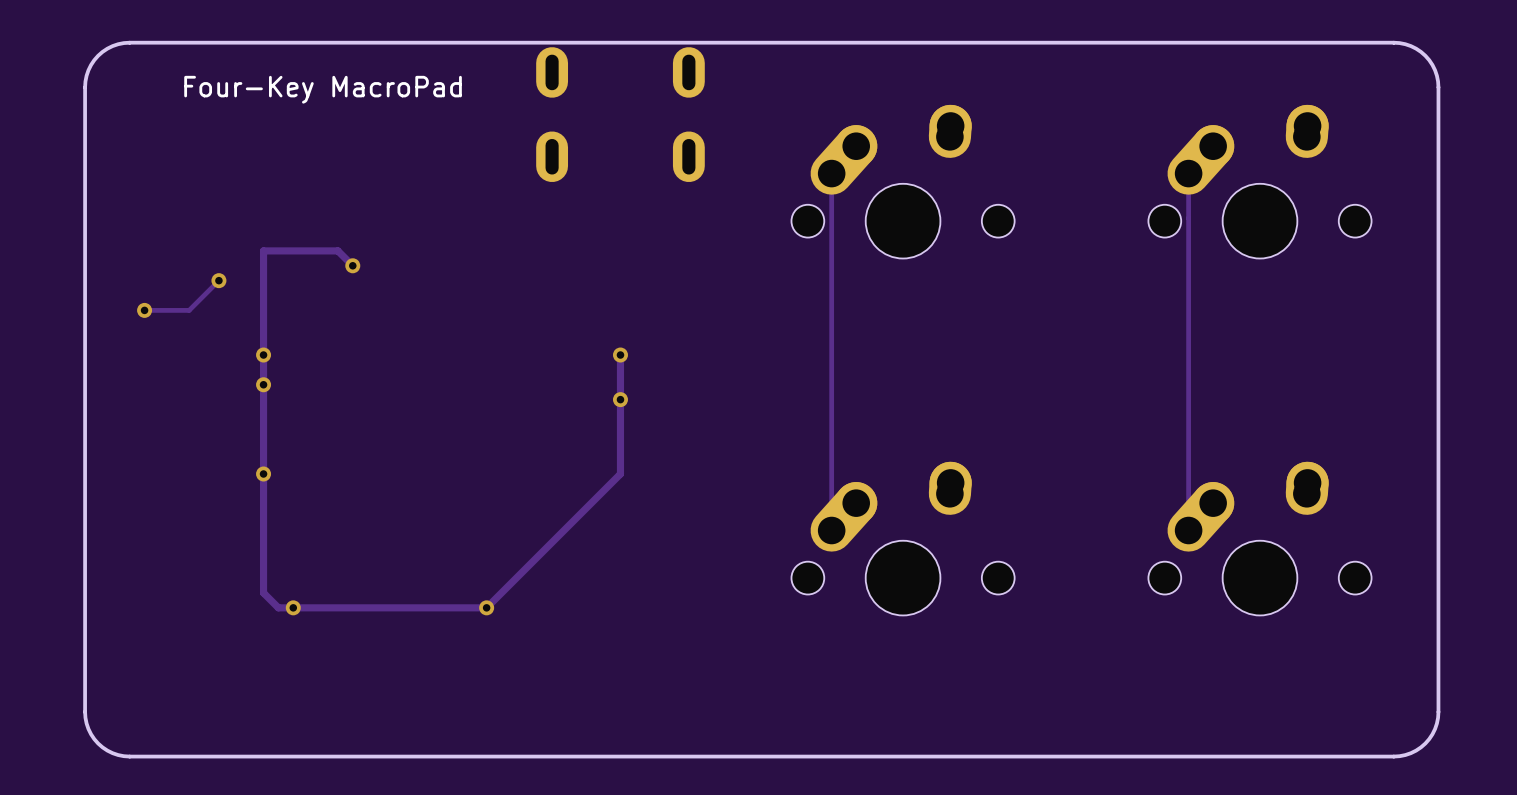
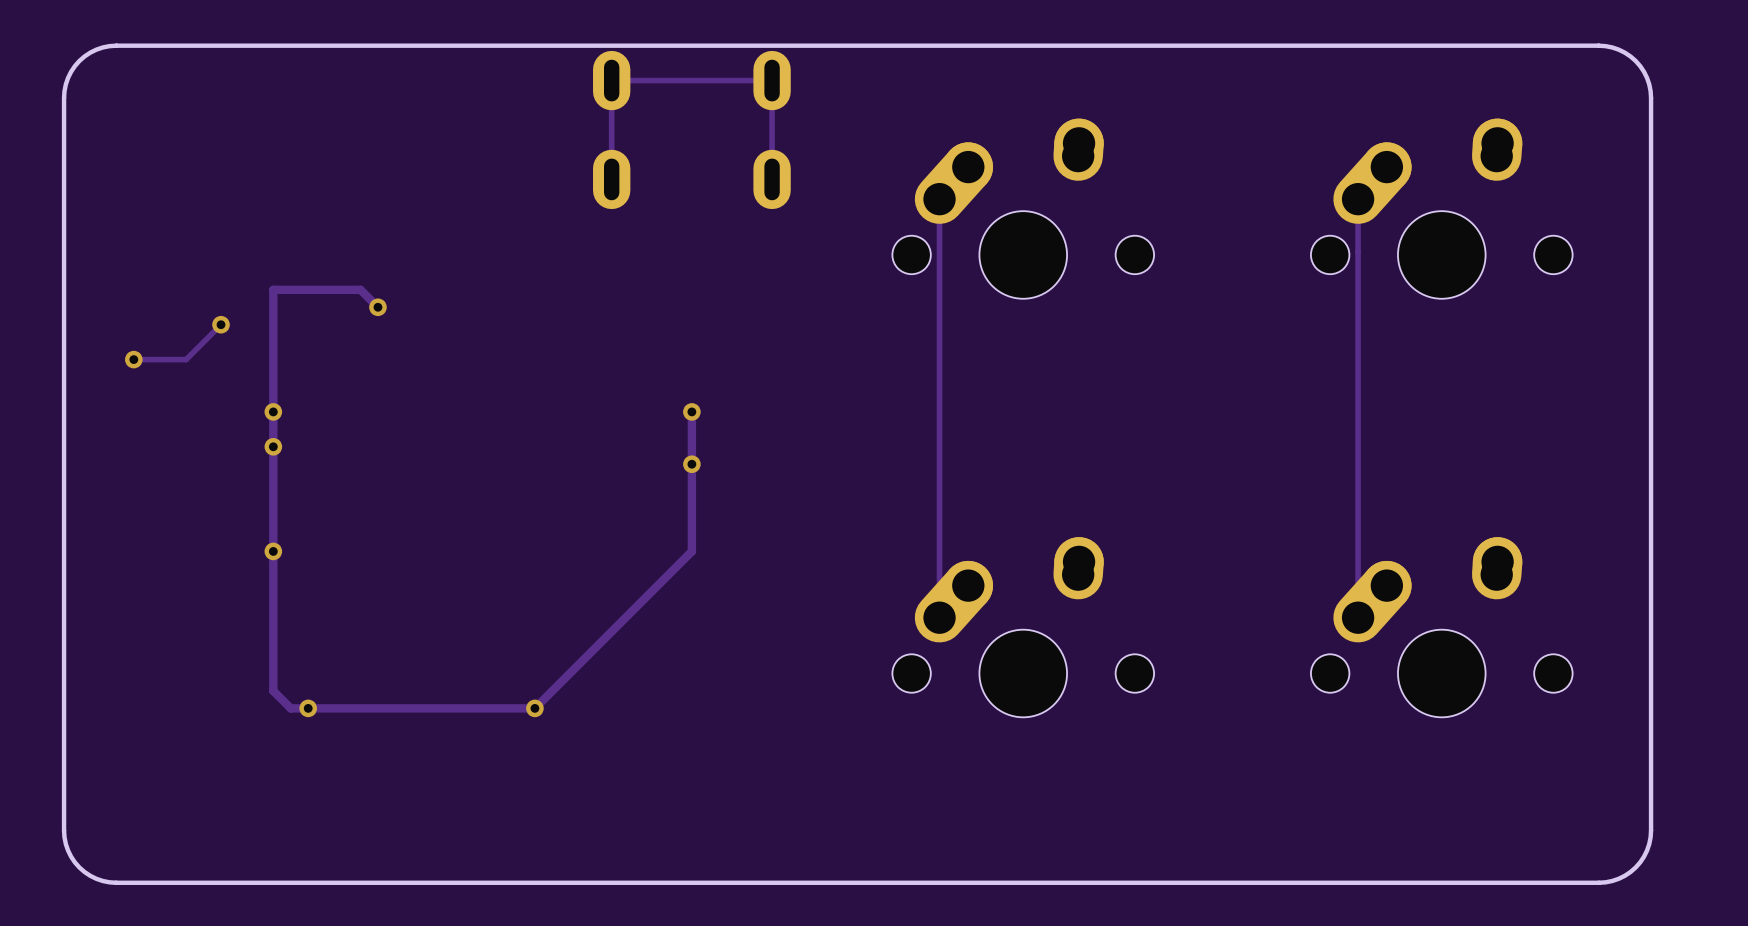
text: Four-Key MacroPad (323, 89) -> none
track: none -> (611, 179) (611, 80) (772, 80) (772, 179)

